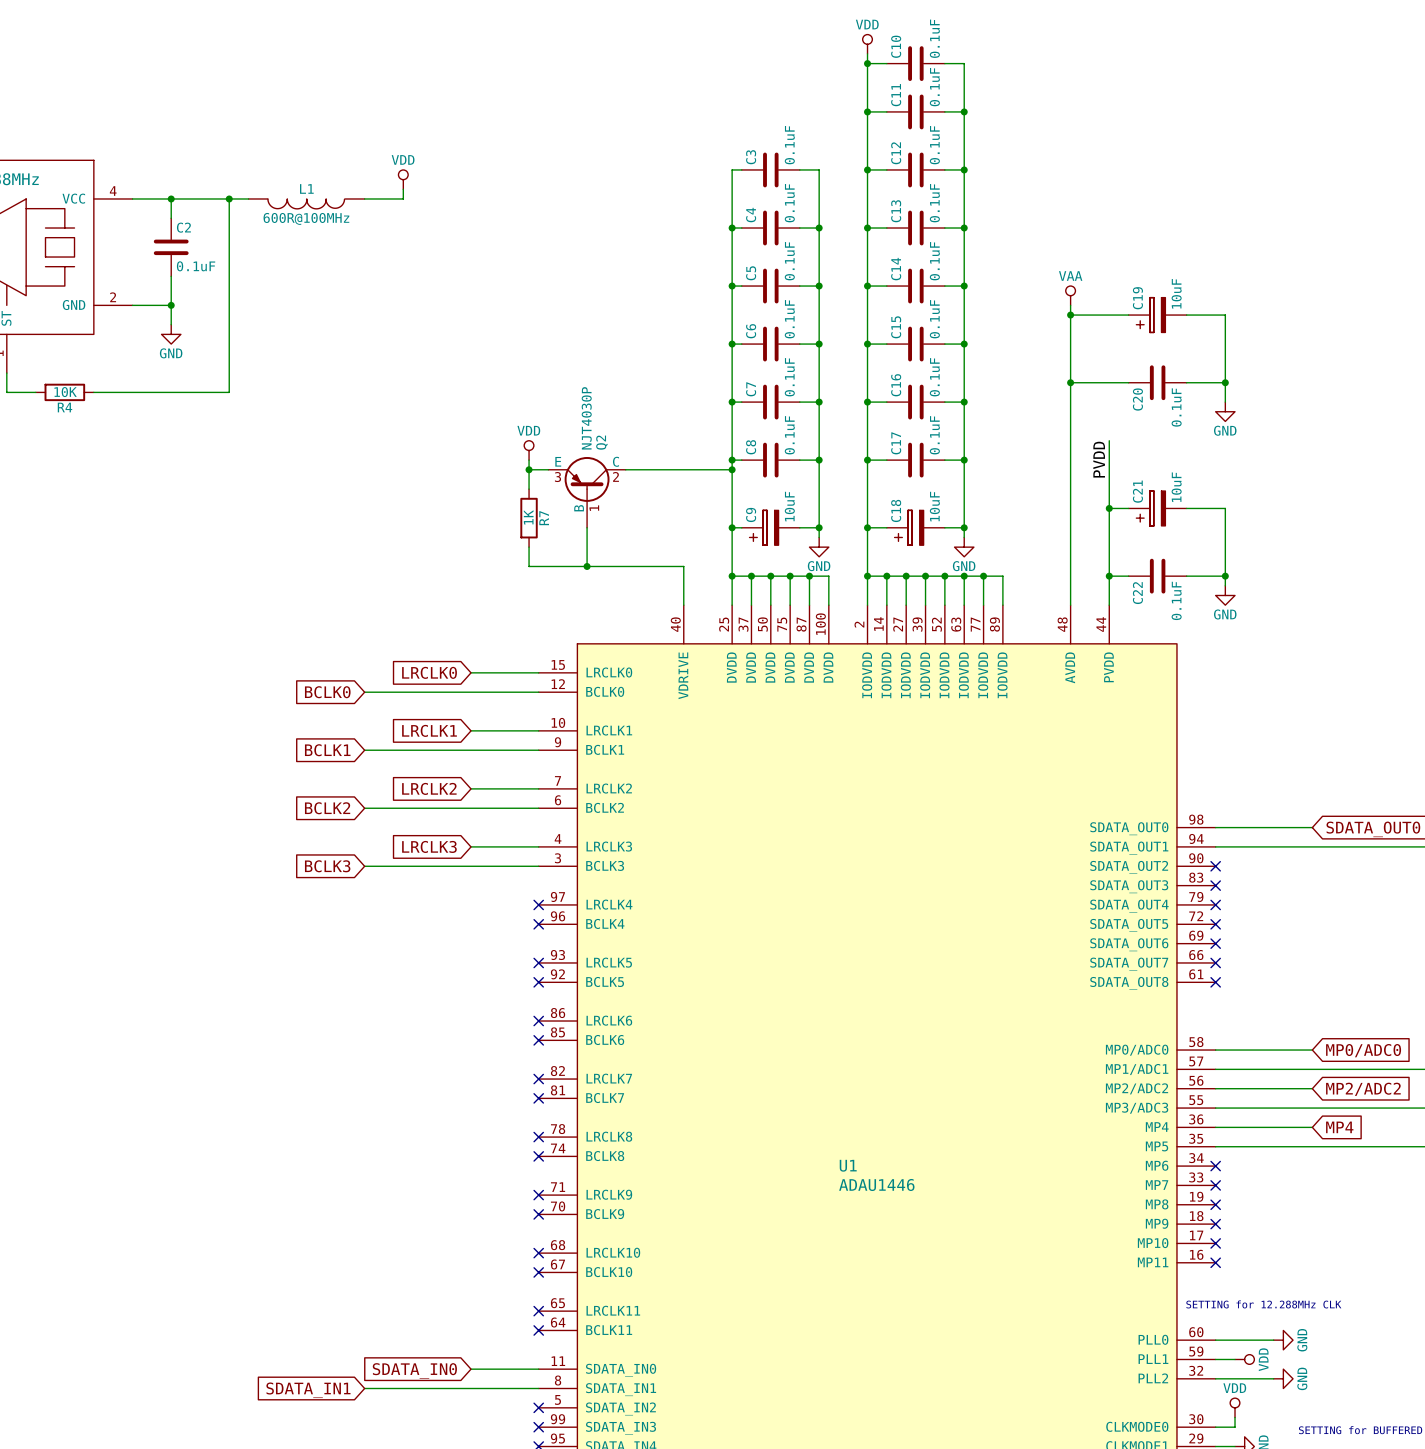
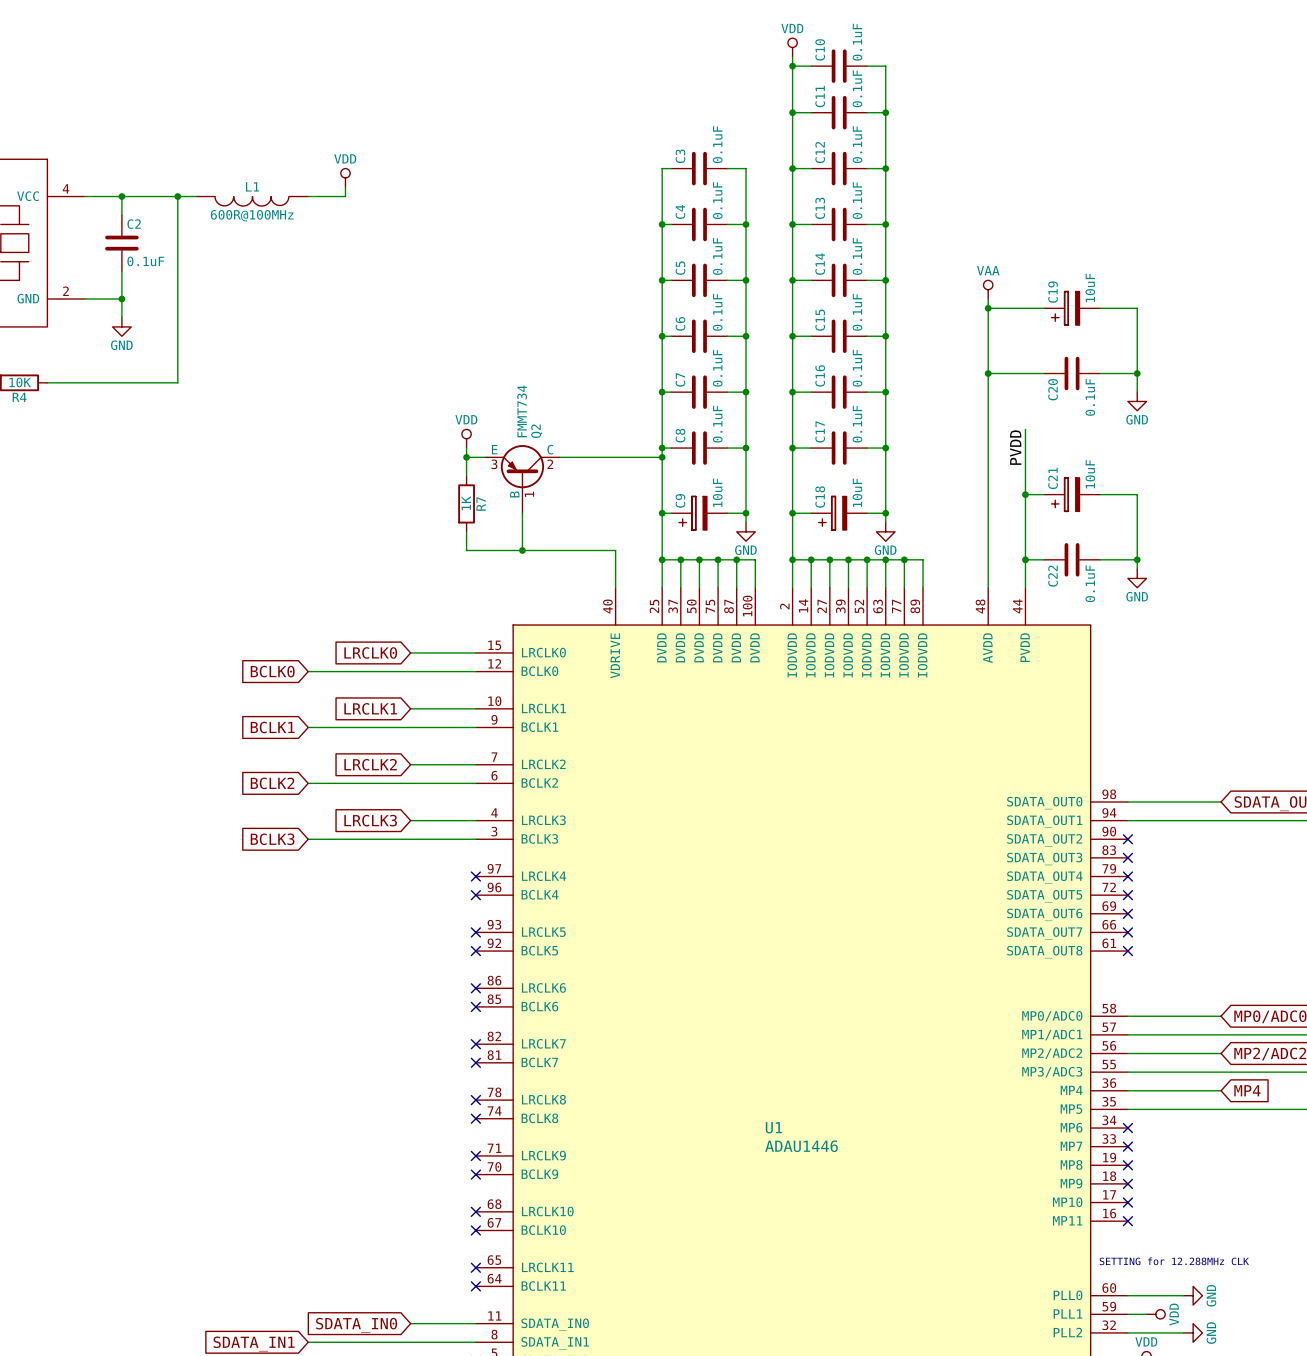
Q2 value: NJT4030P (586, 418) -> FMMT734 (522, 411)

